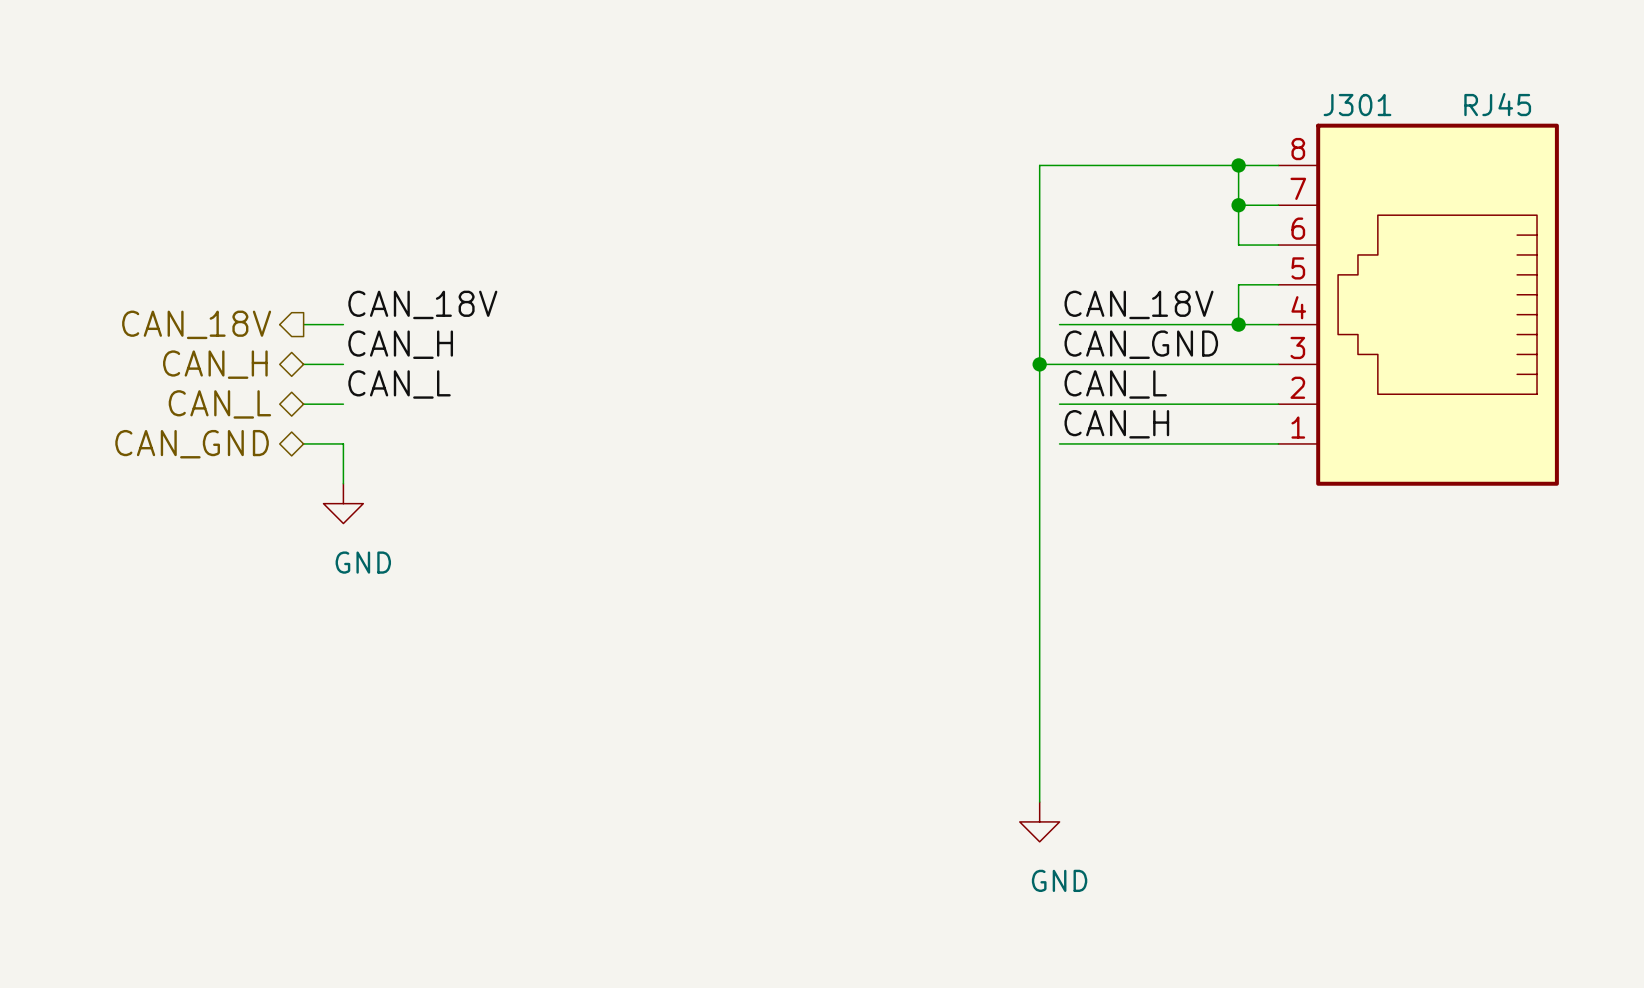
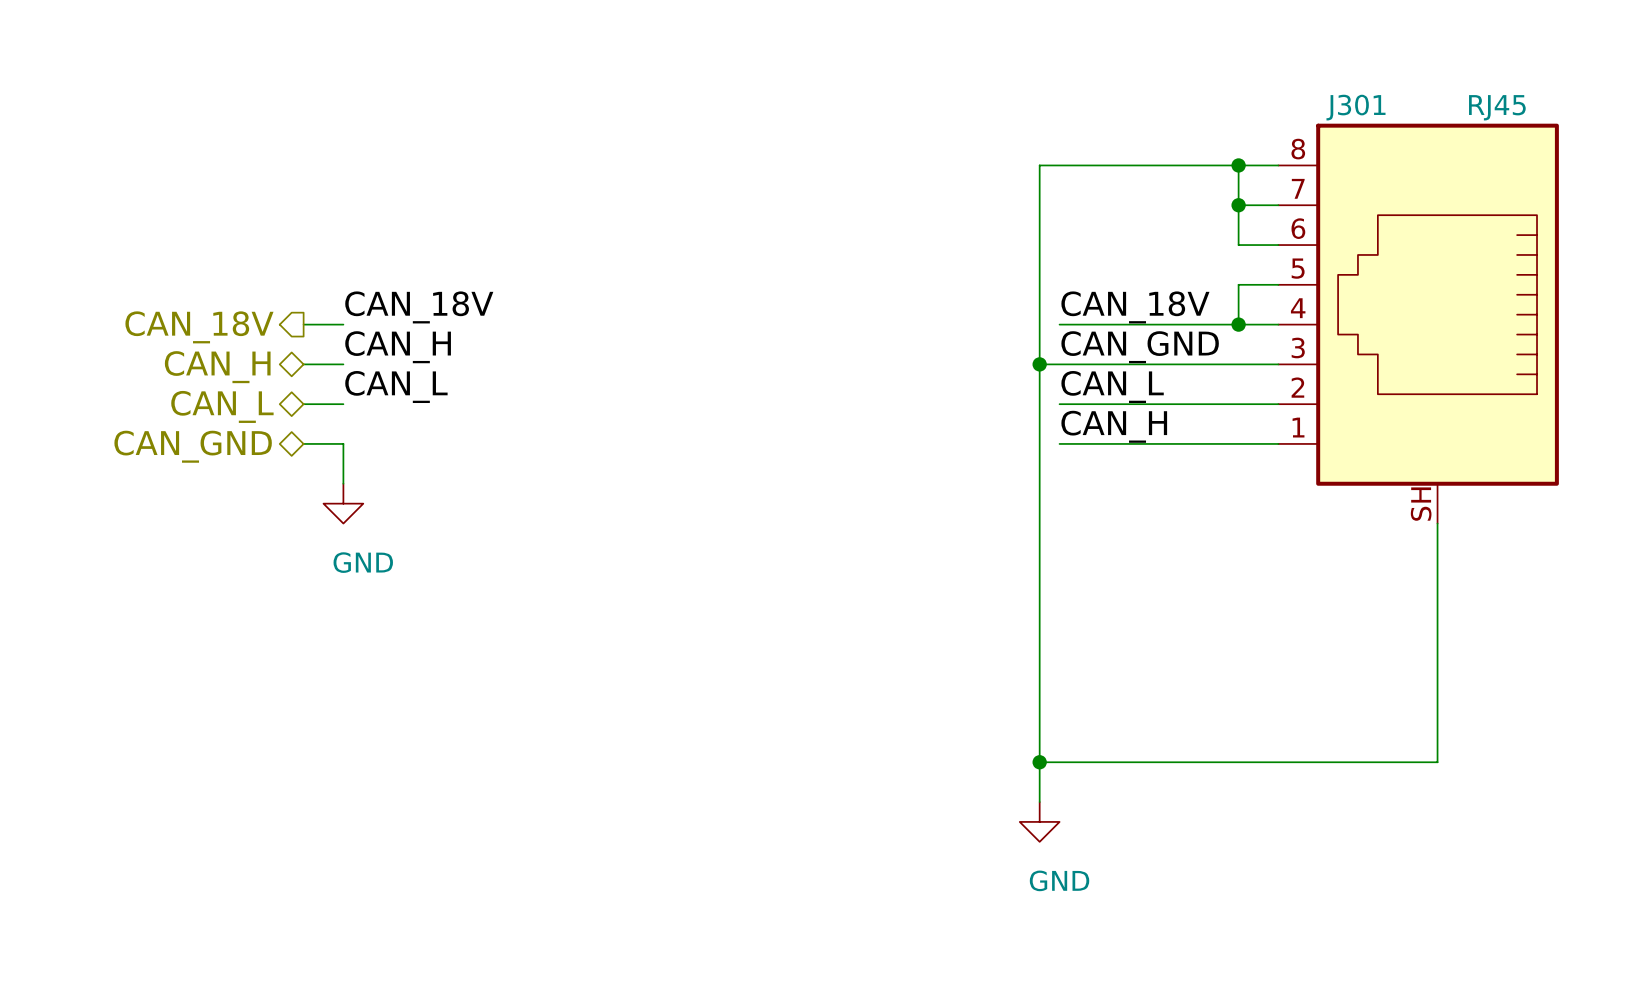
J301 symbol: [1278, 123, 1559, 486] -> [1278, 123, 1559, 524]
wire: none -> (1437, 523) (1437, 762) (1039, 762)
junction: none -> (1039, 762)

